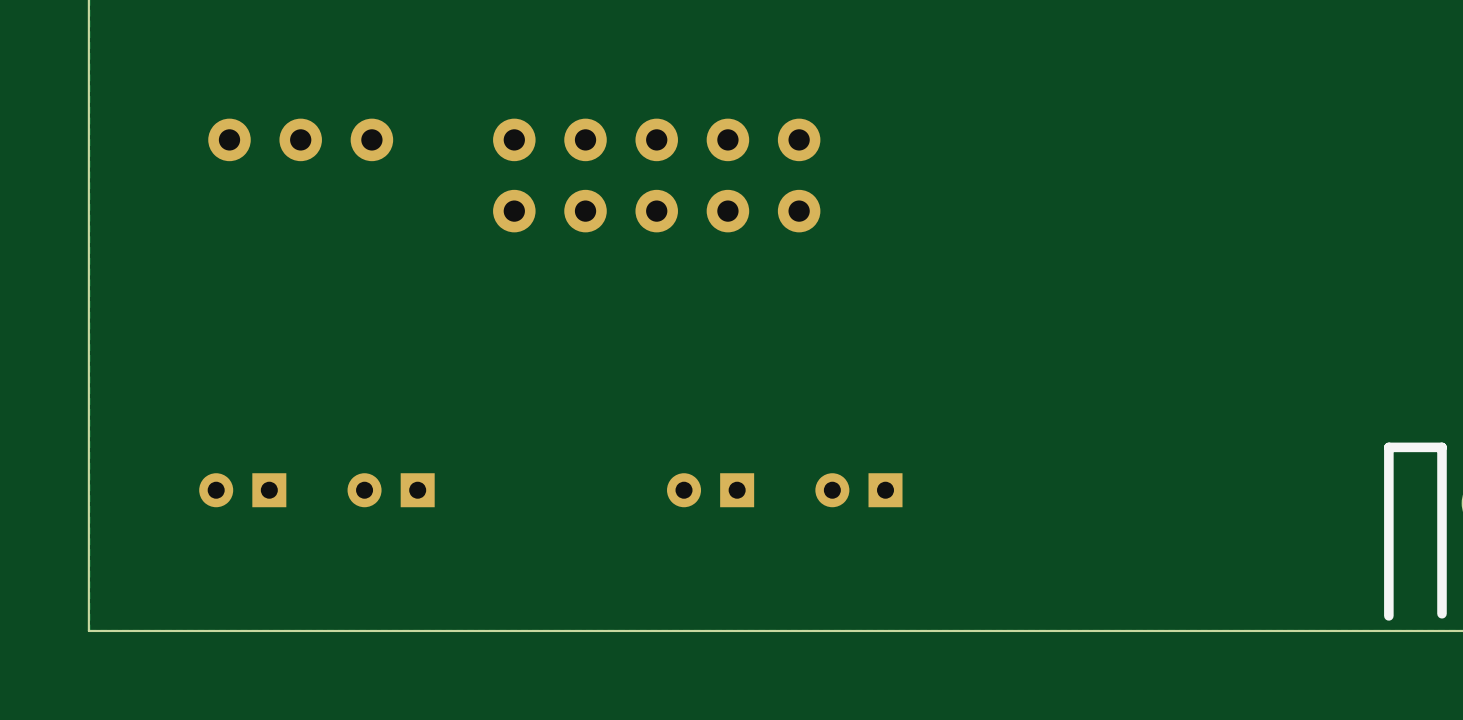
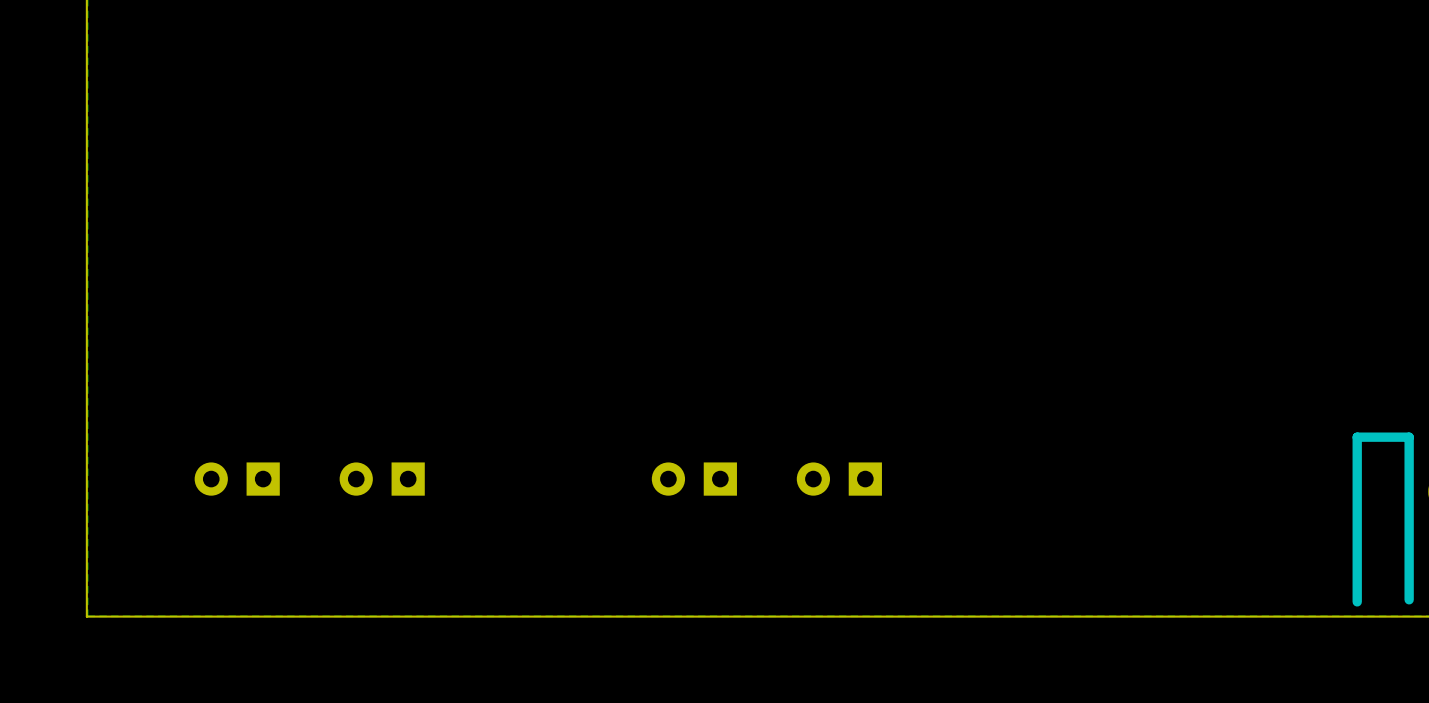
part: (229, 139) -> none
part: (300, 139) -> none
part: (371, 139) -> none
part: (514, 139) -> none
part: (585, 139) -> none
part: (656, 139) -> none
part: (727, 139) -> none
part: (799, 139) -> none
part: (514, 211) -> none
part: (585, 211) -> none
part: (656, 211) -> none
part: (727, 211) -> none
part: (799, 211) -> none

